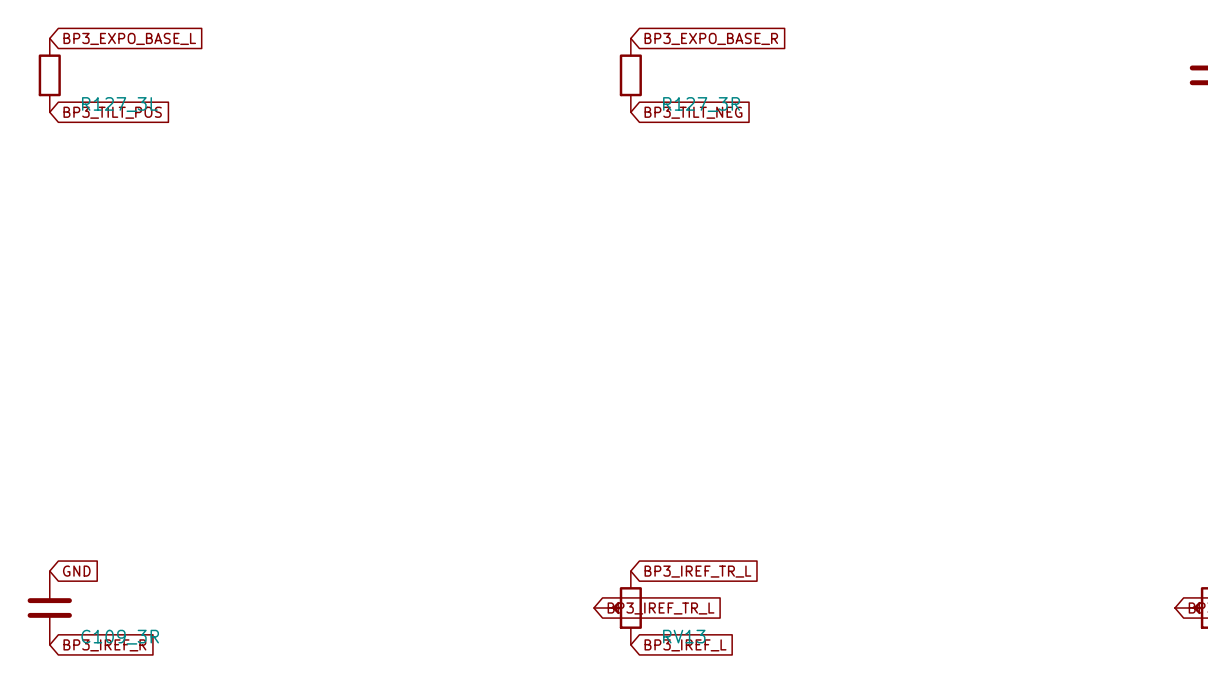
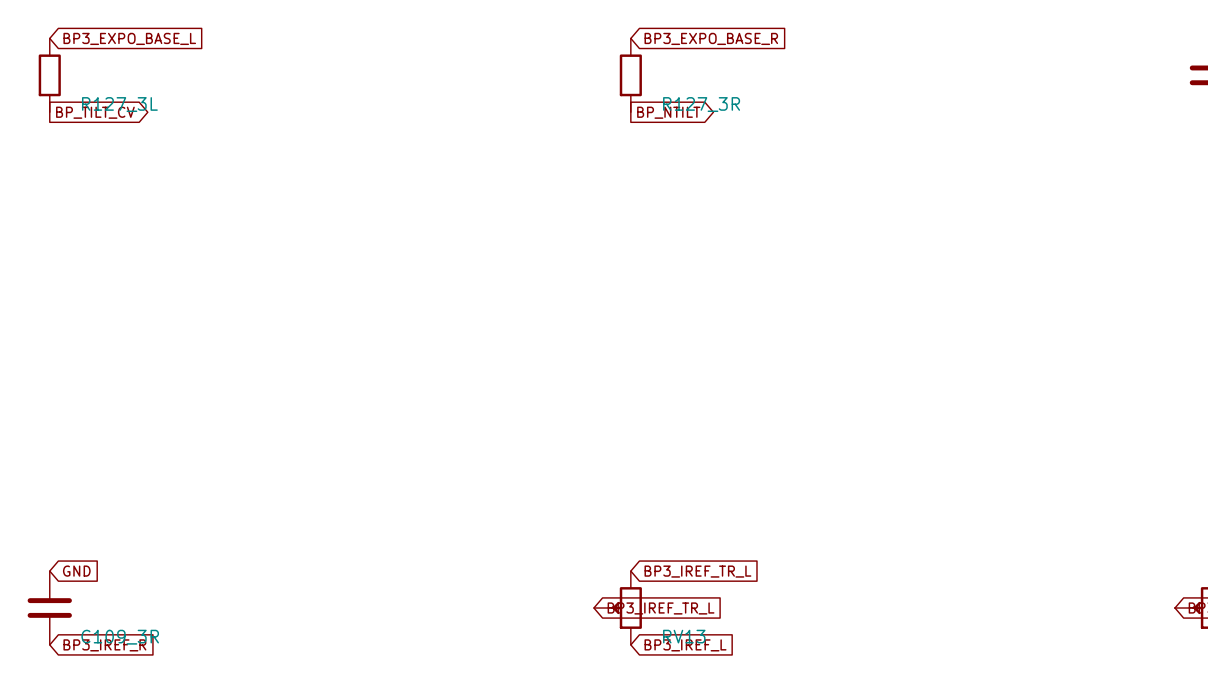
global label shape: input (112, 112) -> output (95, 112)
global label: BP3_TILT_POS (112, 112) -> BP_TILT_CV (95, 112)
global label shape: input (693, 112) -> output (668, 112)
global label: BP3_TILT_NEG (693, 112) -> BP_NTILT (668, 112)

